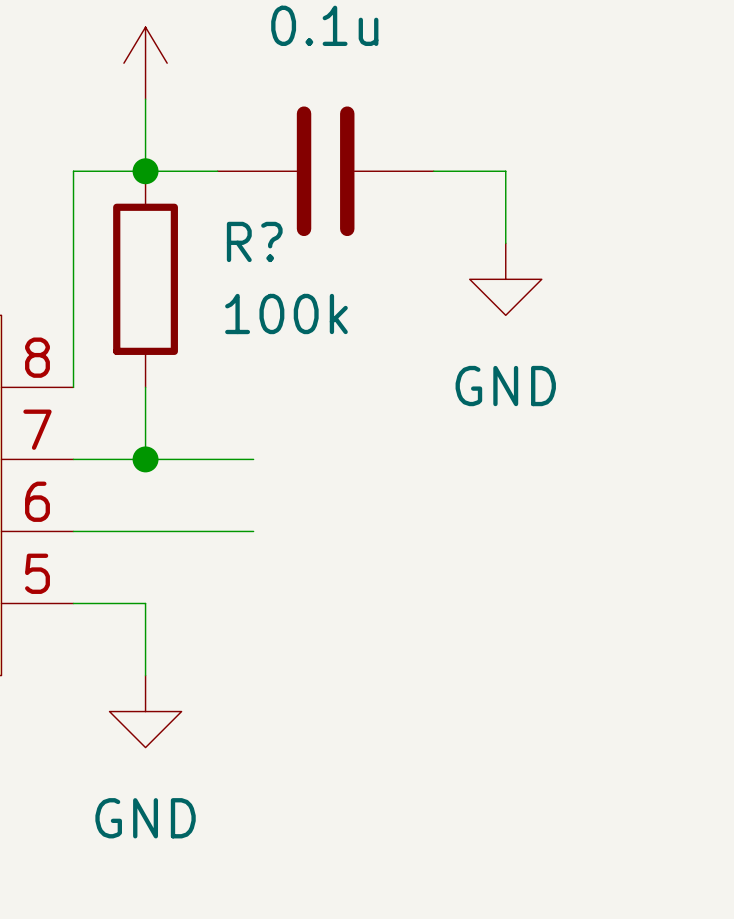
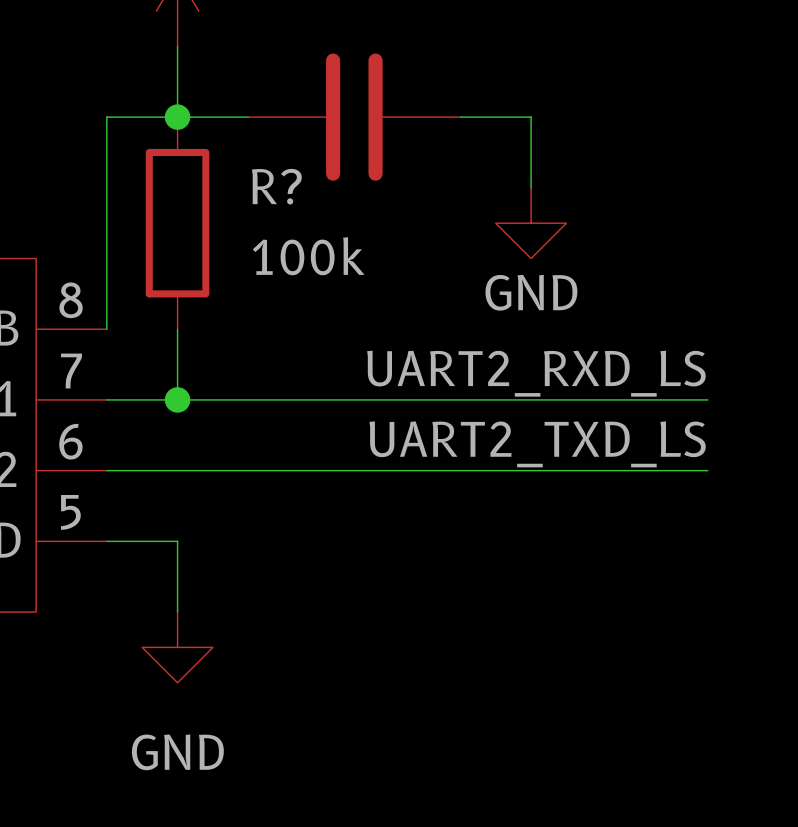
power symbol text position: GND (505, 386) -> GND (531, 292)
label: none -> UART2_RXD_LS (536, 373)
wire: none -> (283, 399) (707, 399)
label: none -> UART2_TXD_LS (537, 444)
wire: none -> (283, 470) (707, 470)

